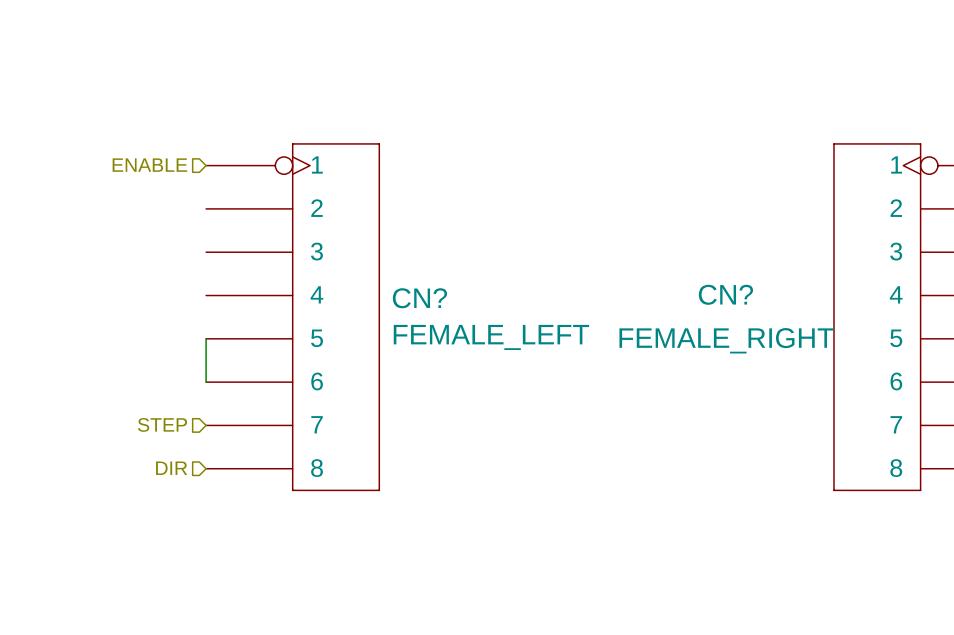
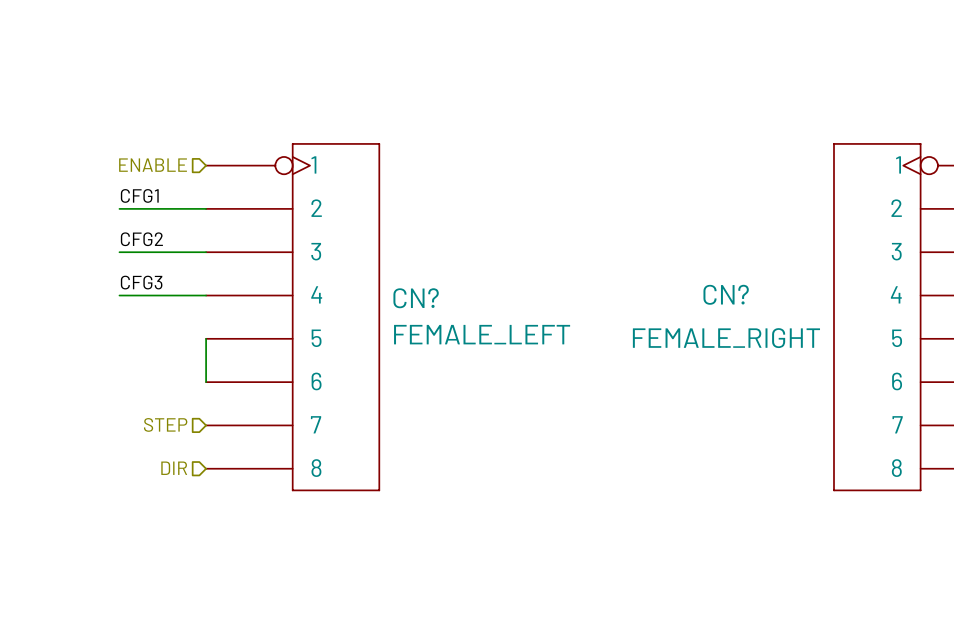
label: none -> CFG1 (139, 195)
wire: none -> (119, 208) (206, 208)
label: none -> CFG2 (141, 239)
wire: none -> (119, 252) (206, 252)
label: none -> CFG3 (141, 282)
wire: none -> (119, 295) (206, 295)

